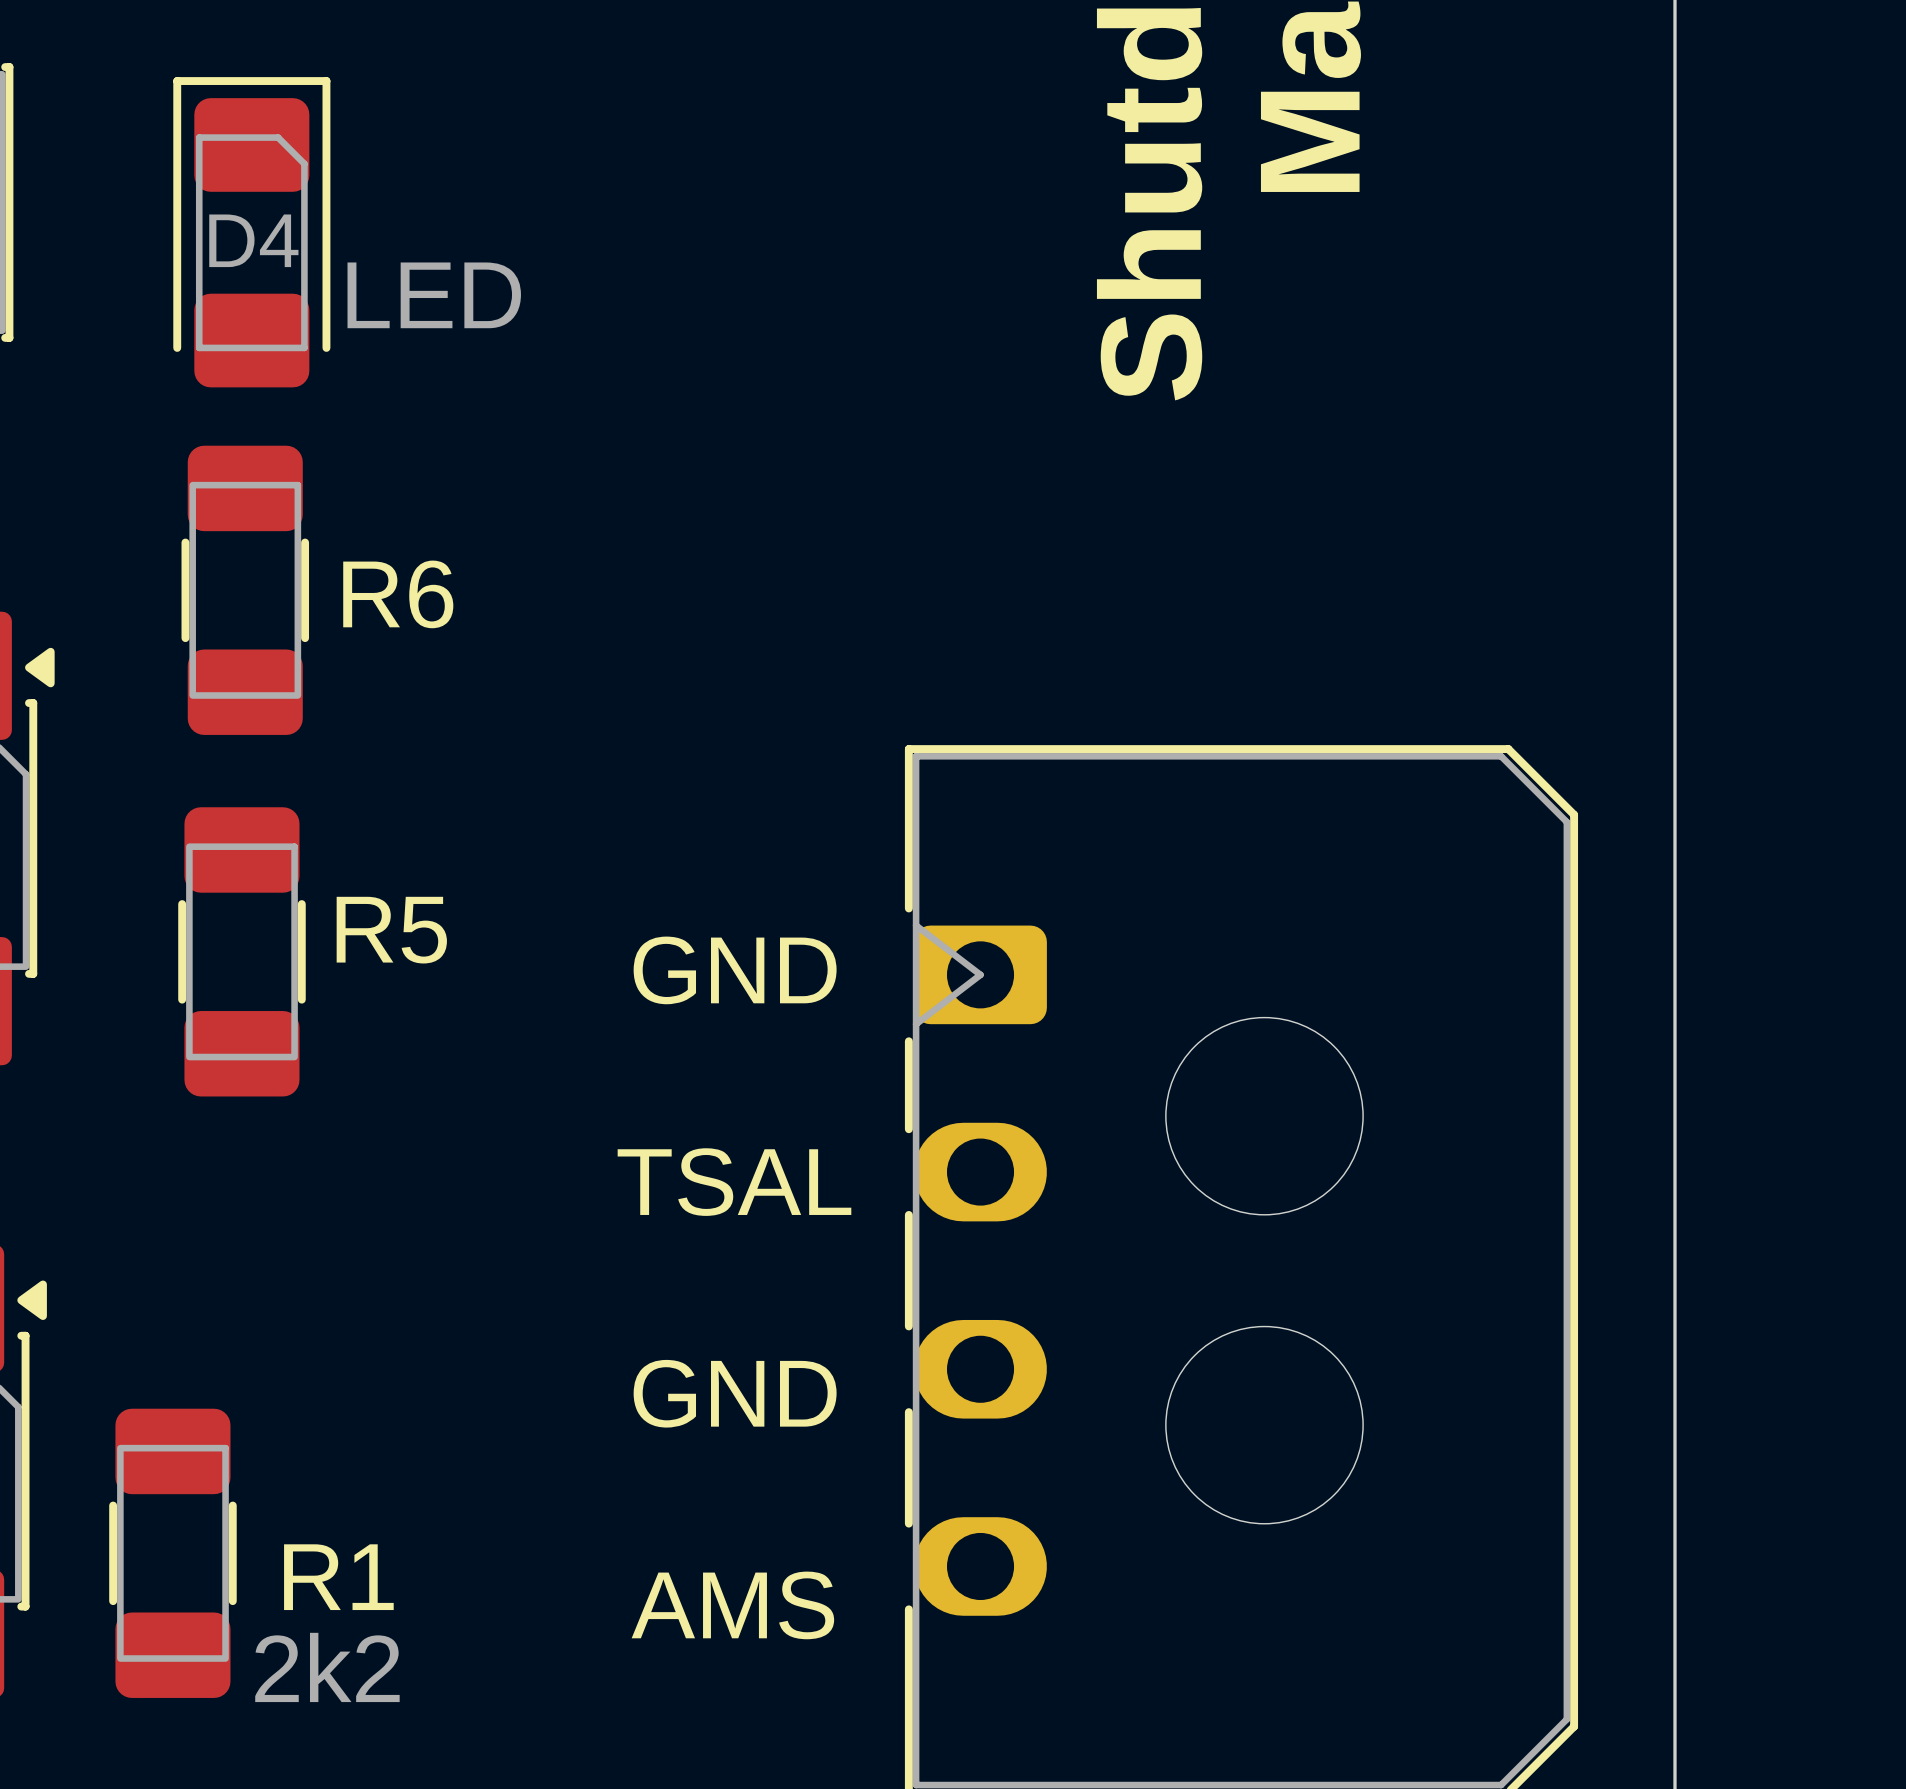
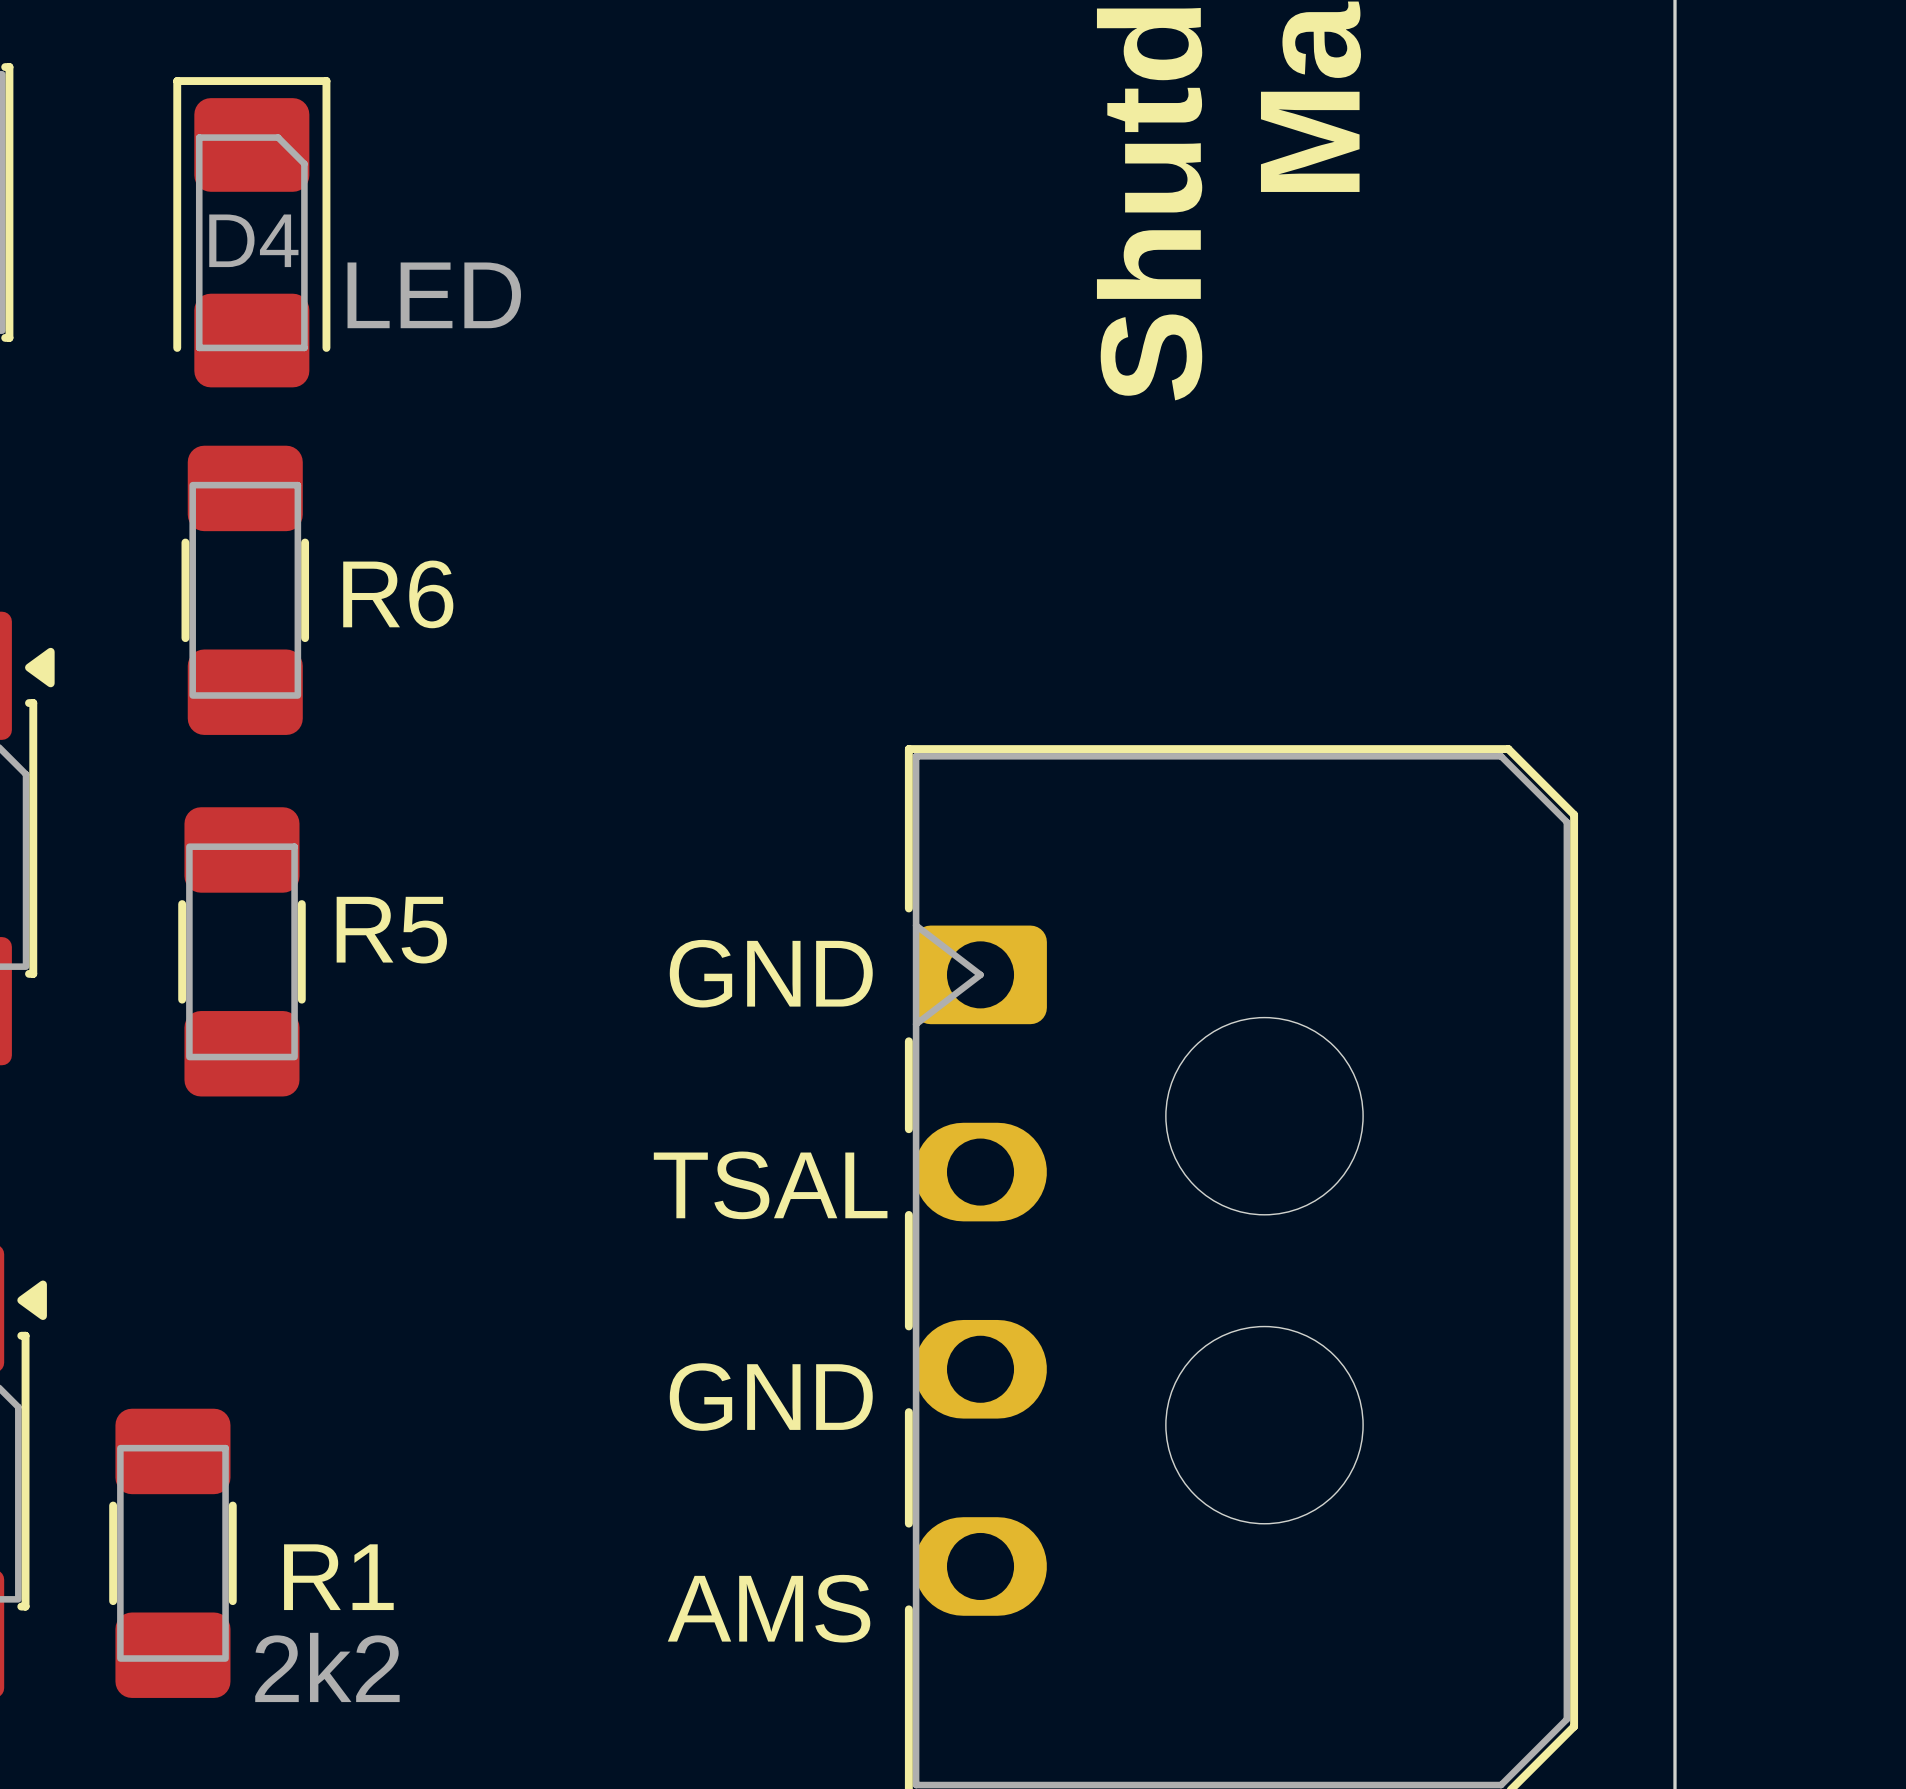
text position: GND (735, 970) -> GND (771, 973)
text position: TSAL (734, 1182) -> TSAL (770, 1185)
text position: GND (735, 1393) -> GND (771, 1397)
text position: AMS (732, 1605) -> AMS (769, 1608)

